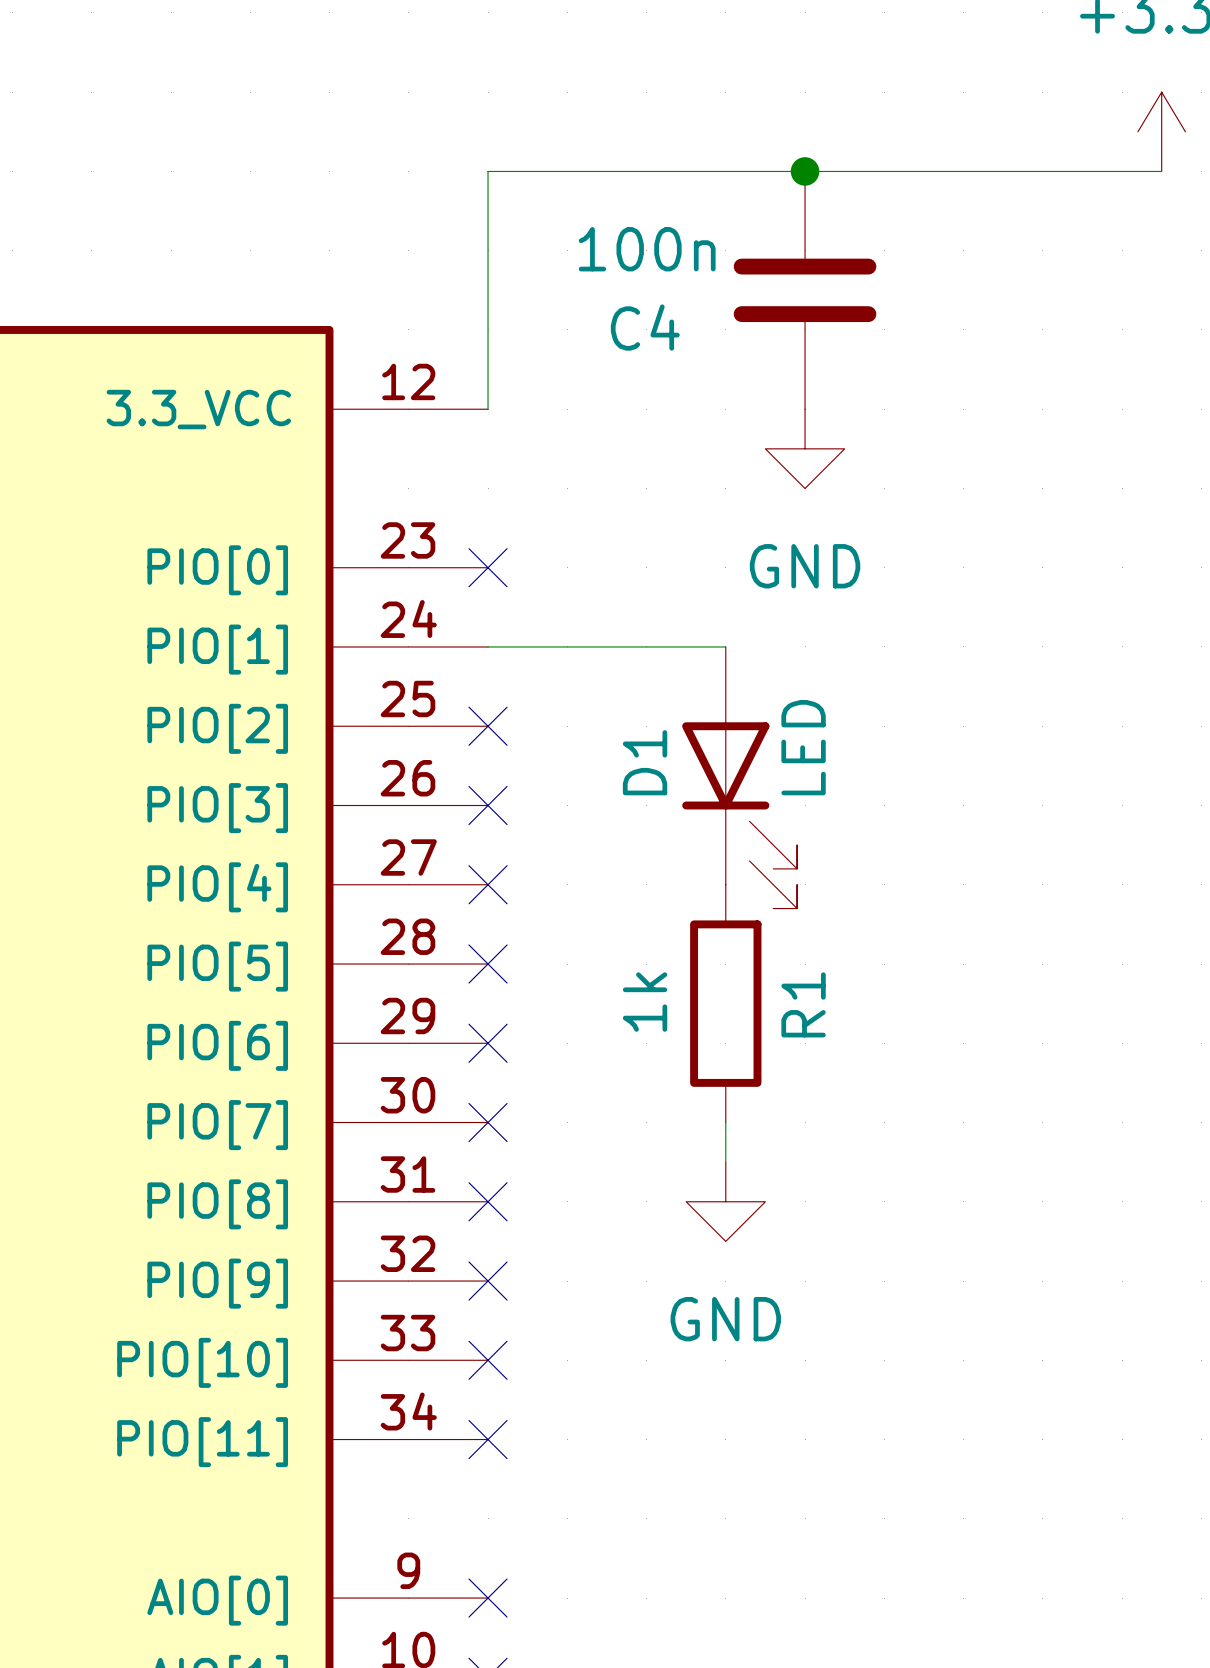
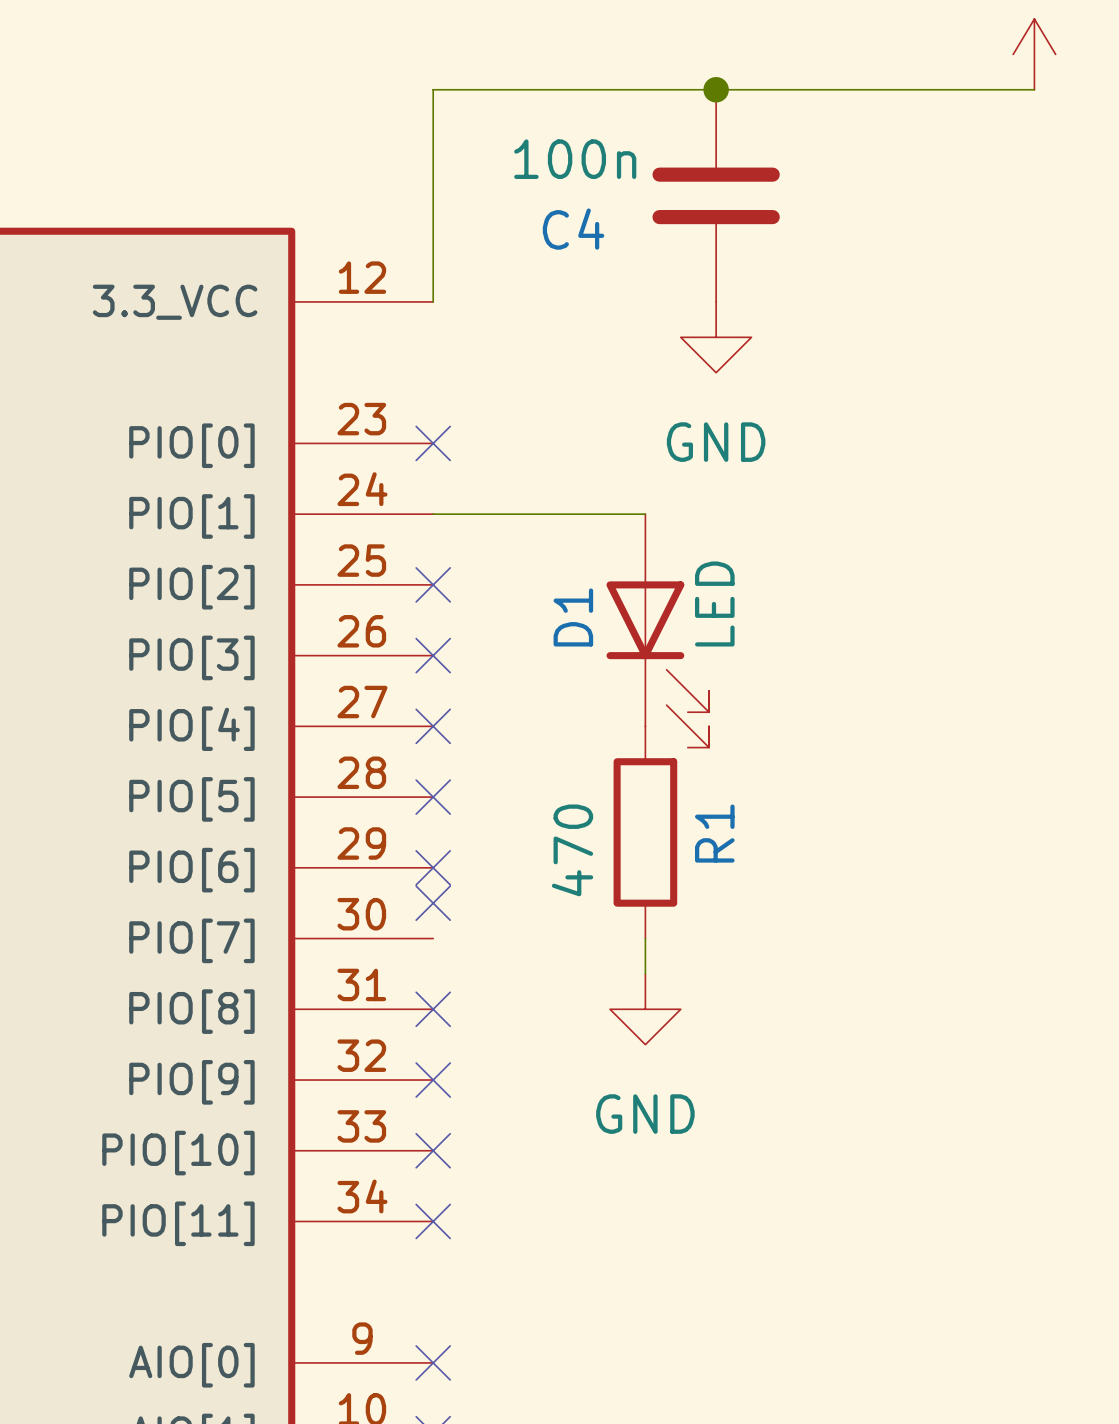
R1 value: 1k (645, 1002) -> 470 (572, 850)
no-connect mark position: (488, 1122) -> (433, 903)

